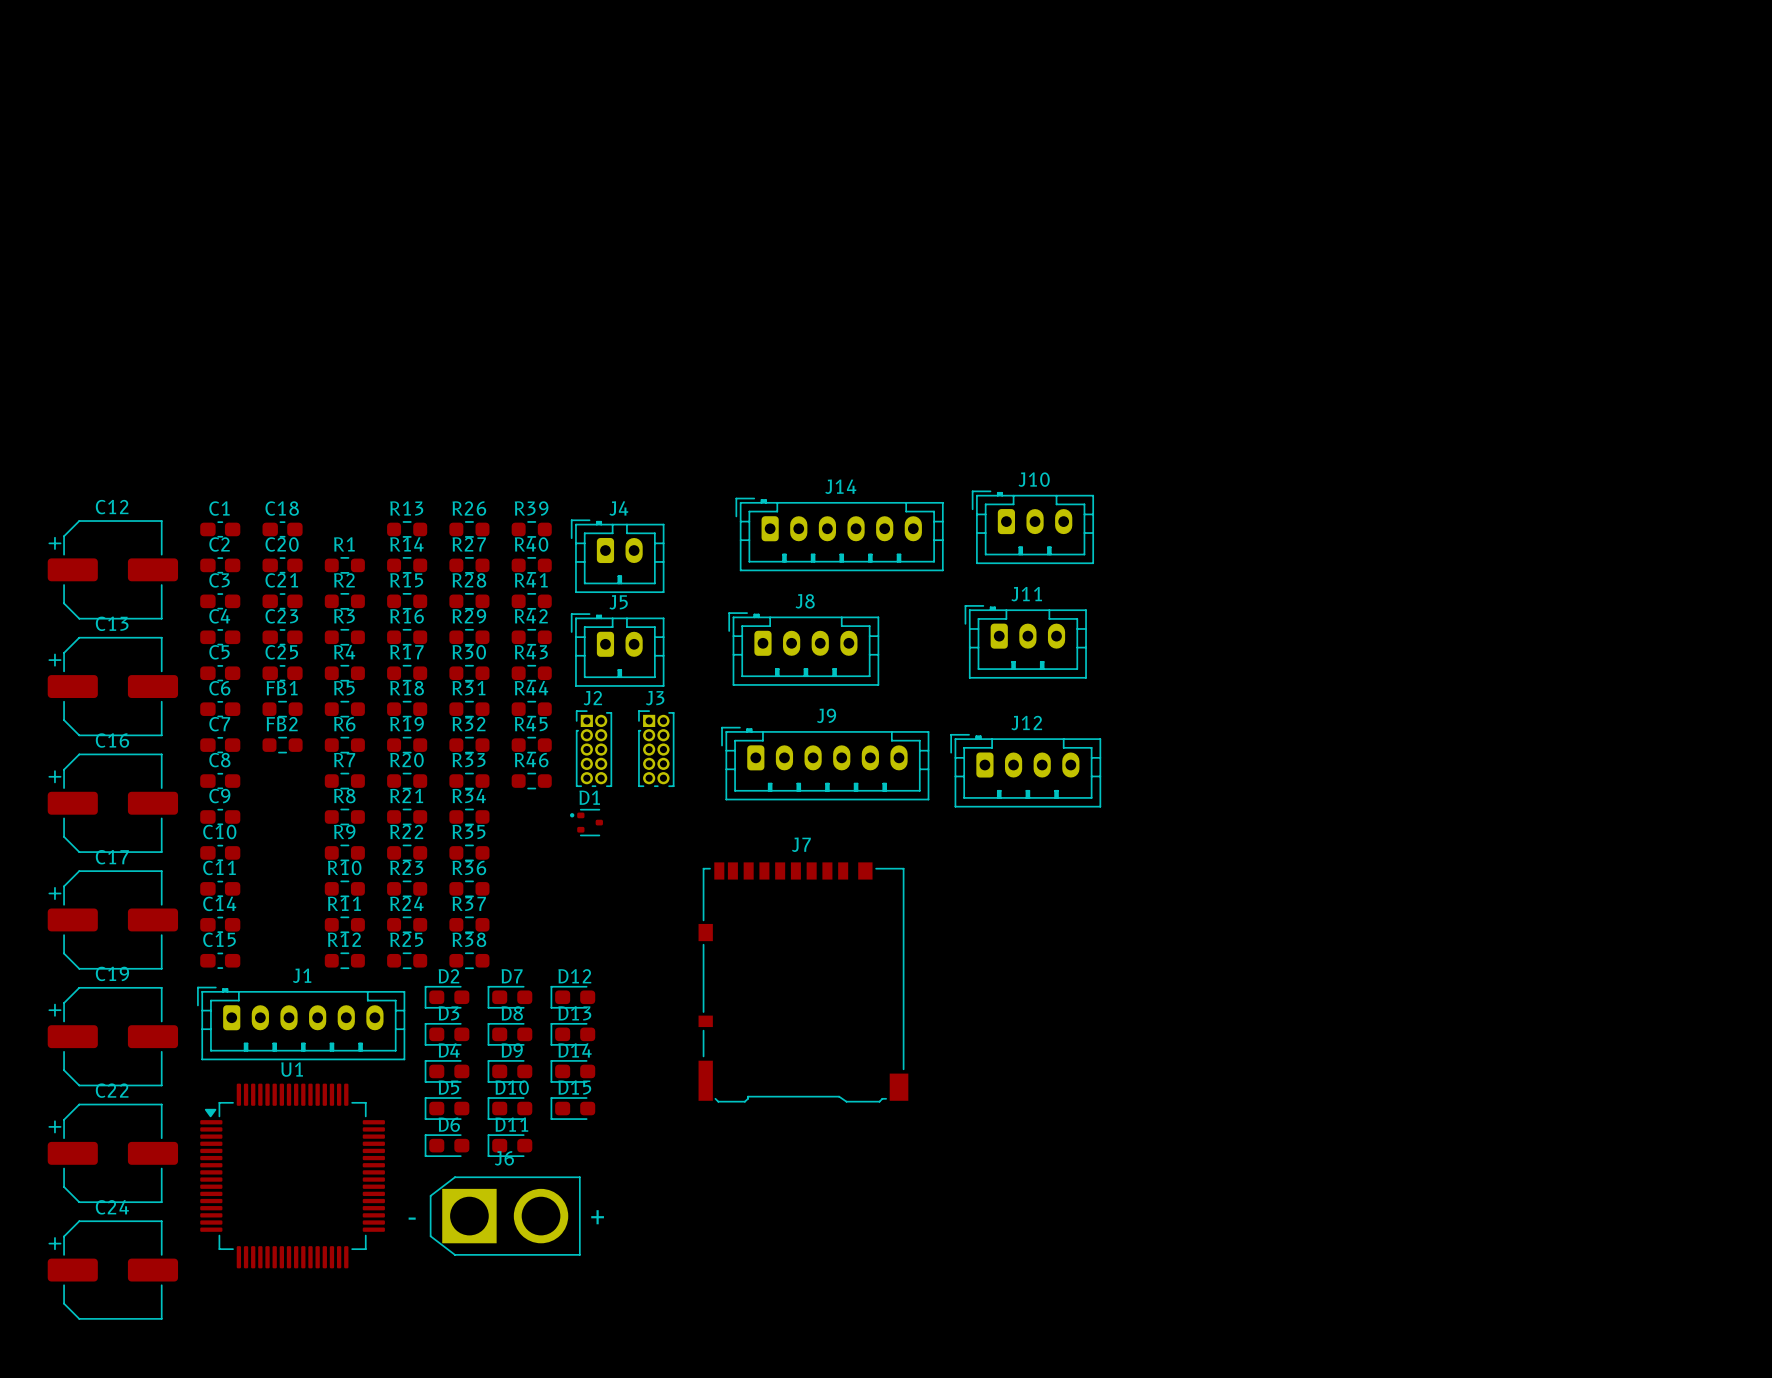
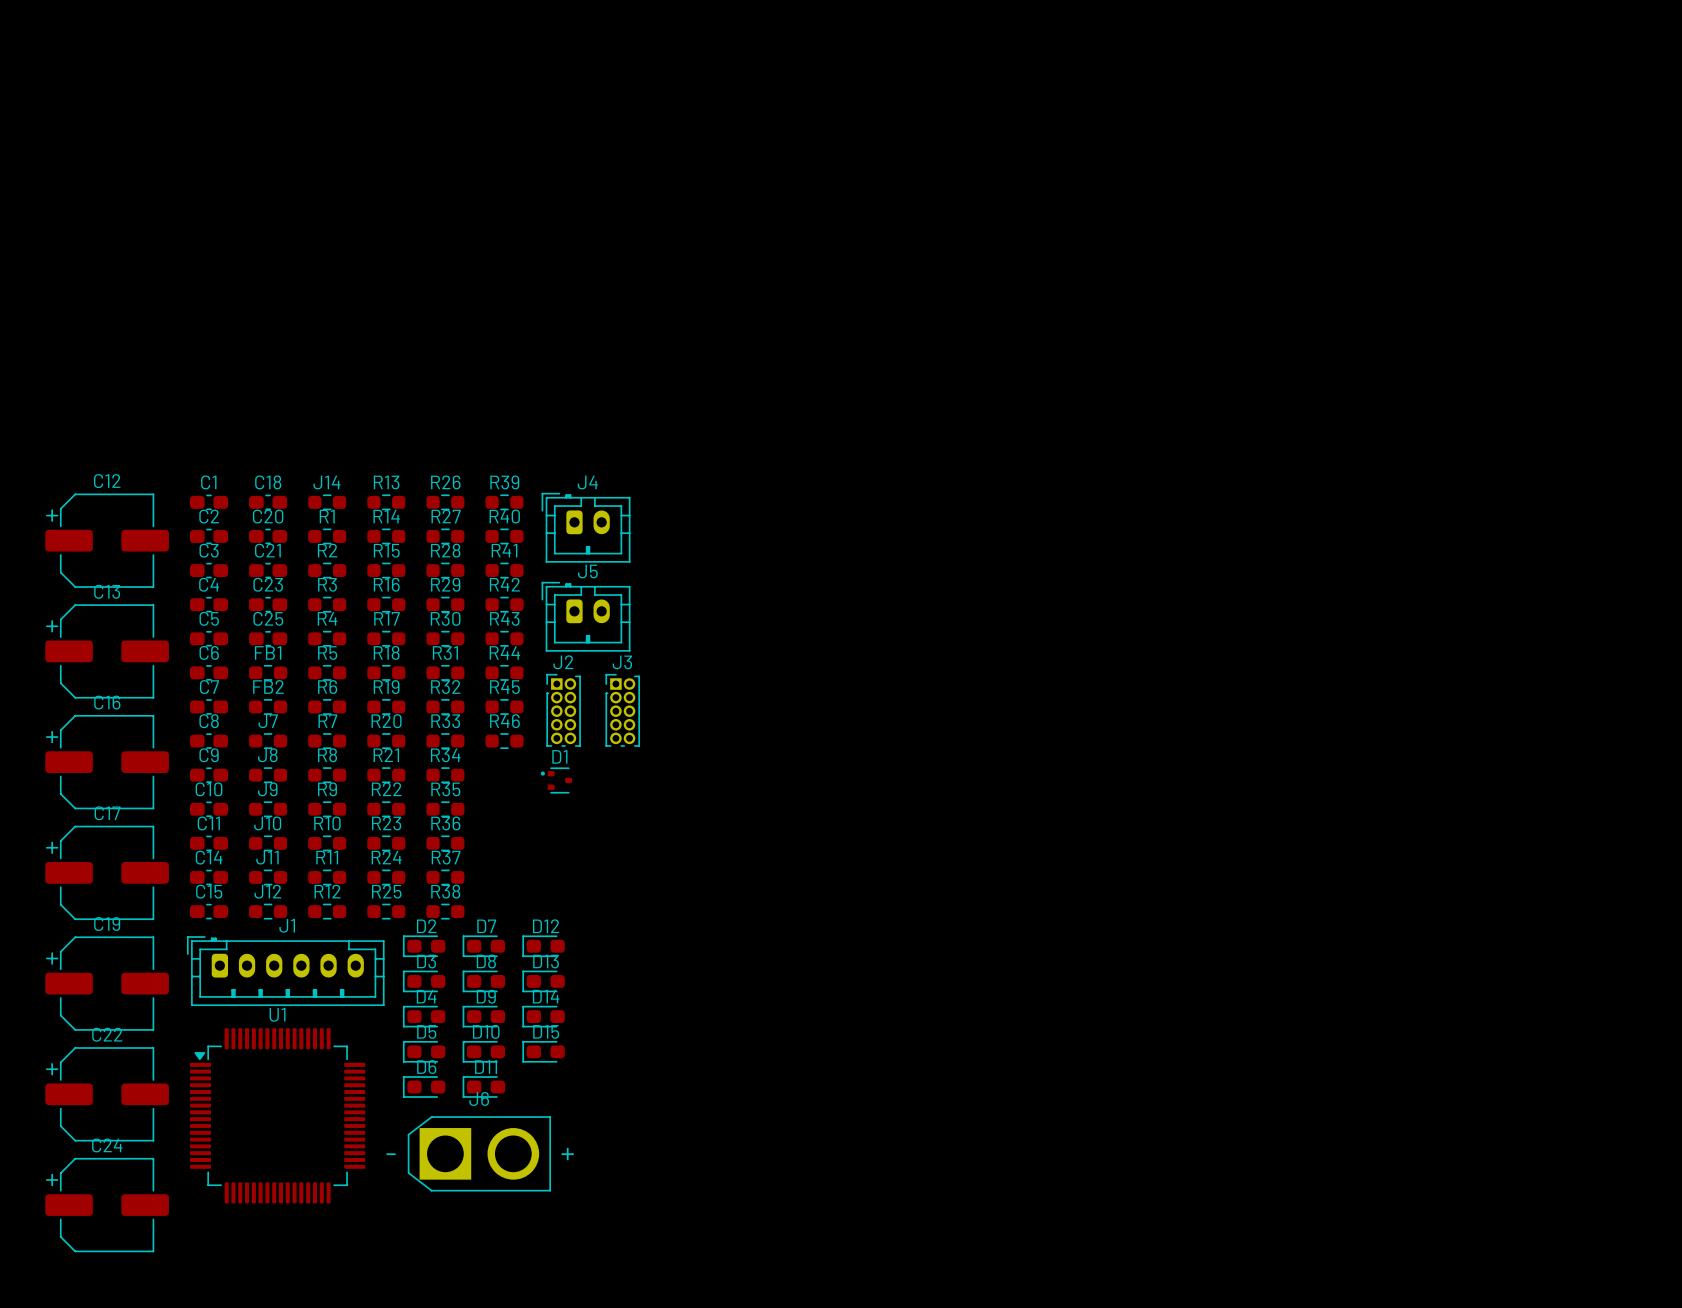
J10 footprint: [971, 490, 1095, 565] -> [249, 835, 288, 852]
J14 footprint: [735, 497, 944, 572] -> [308, 494, 347, 511]
J11 footprint: [964, 605, 1087, 679] -> [249, 869, 288, 886]
J8 footprint: [728, 612, 880, 686] -> [249, 767, 288, 784]
J9 footprint: [721, 726, 930, 801] -> [249, 801, 288, 818]
J12 footprint: [950, 733, 1102, 808] -> [249, 903, 288, 920]
J7 name position: J7 (801, 844) -> J7 (268, 721)
J7 footprint: [698, 862, 909, 1103] -> [249, 733, 288, 749]

